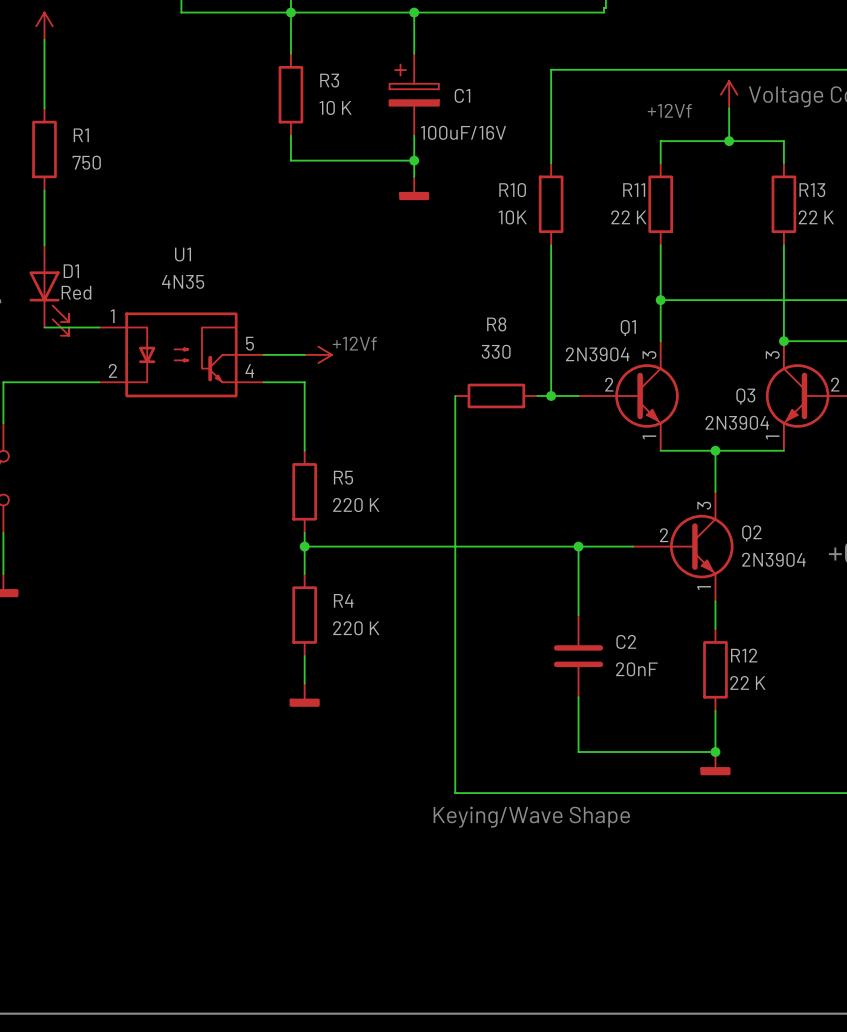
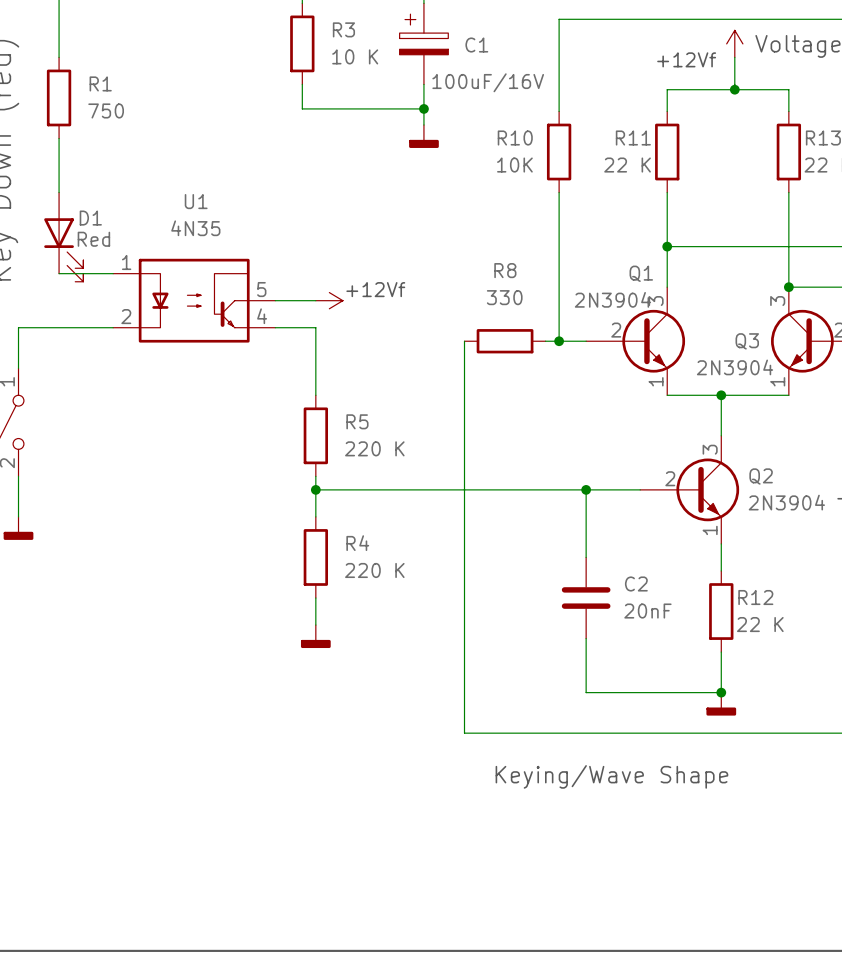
text position: Keying/Wave Shape (531, 817) -> Keying/Wave Shape (611, 776)

